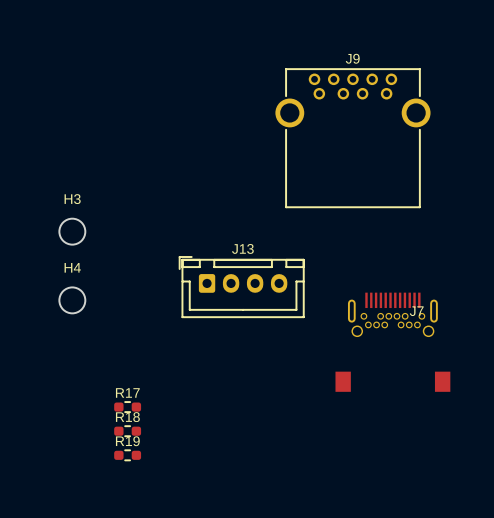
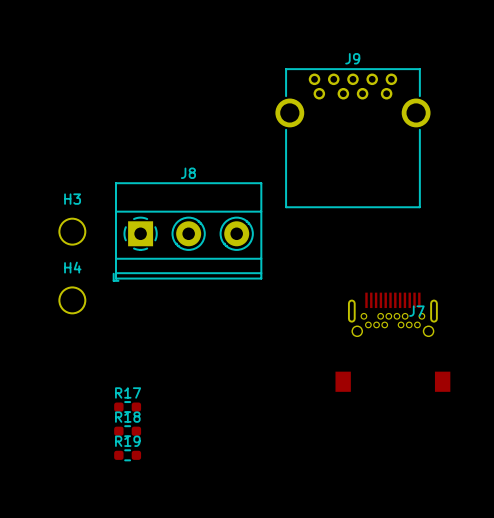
J8: none -> (187, 232)
J13: (241, 287) -> none

